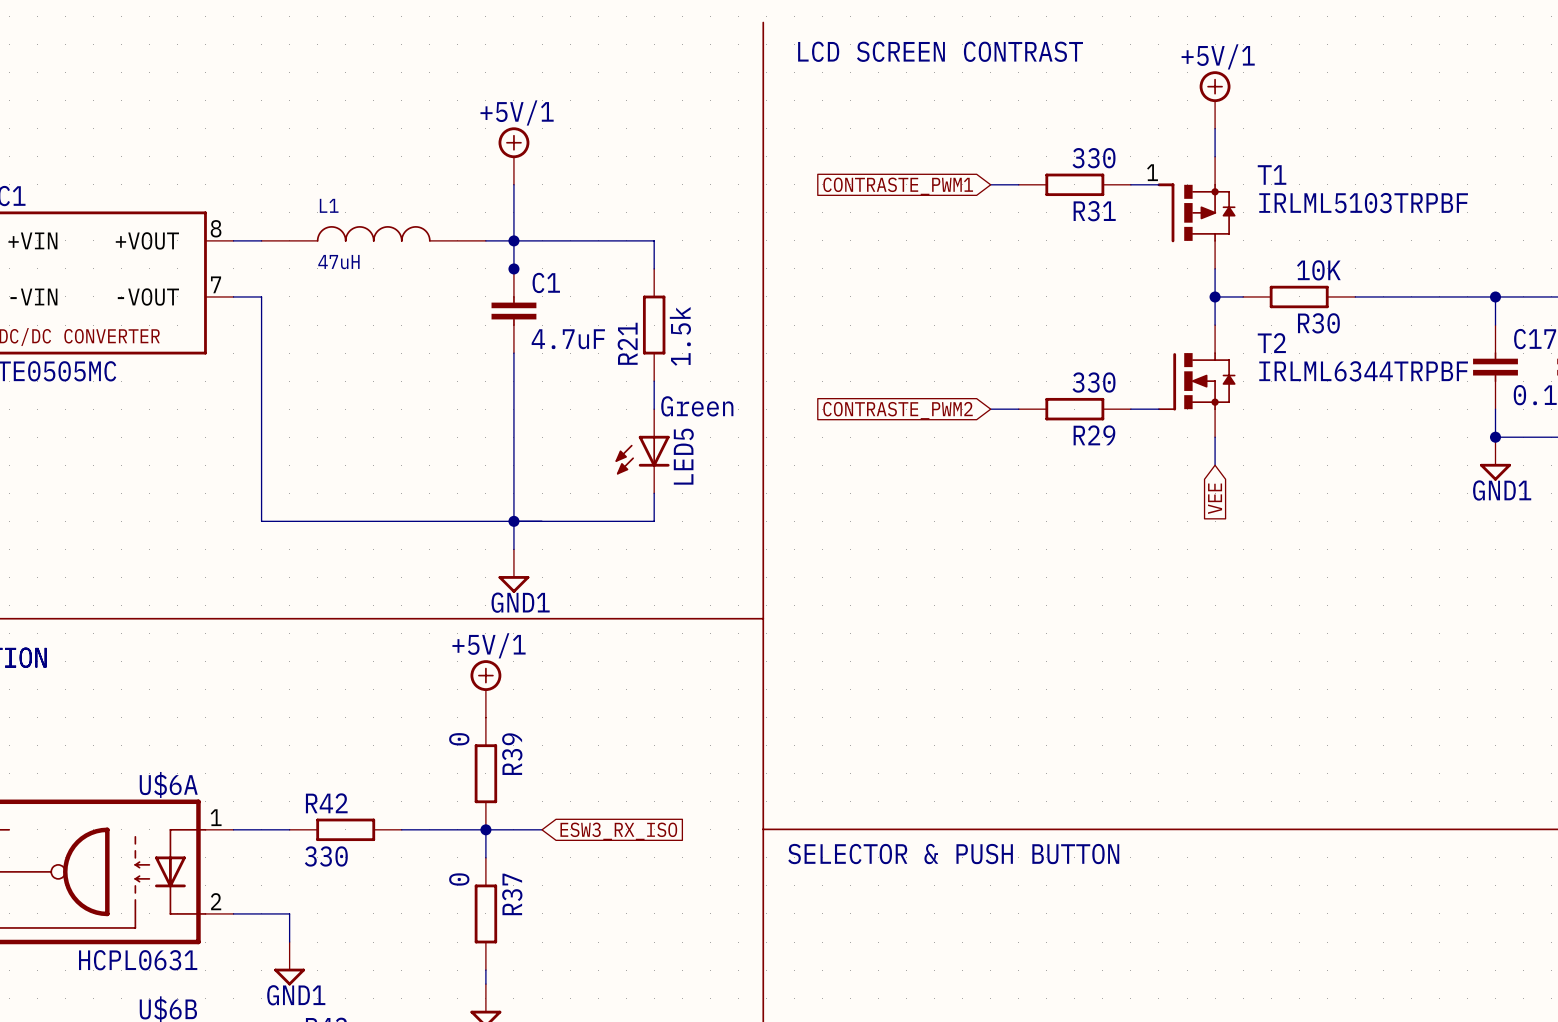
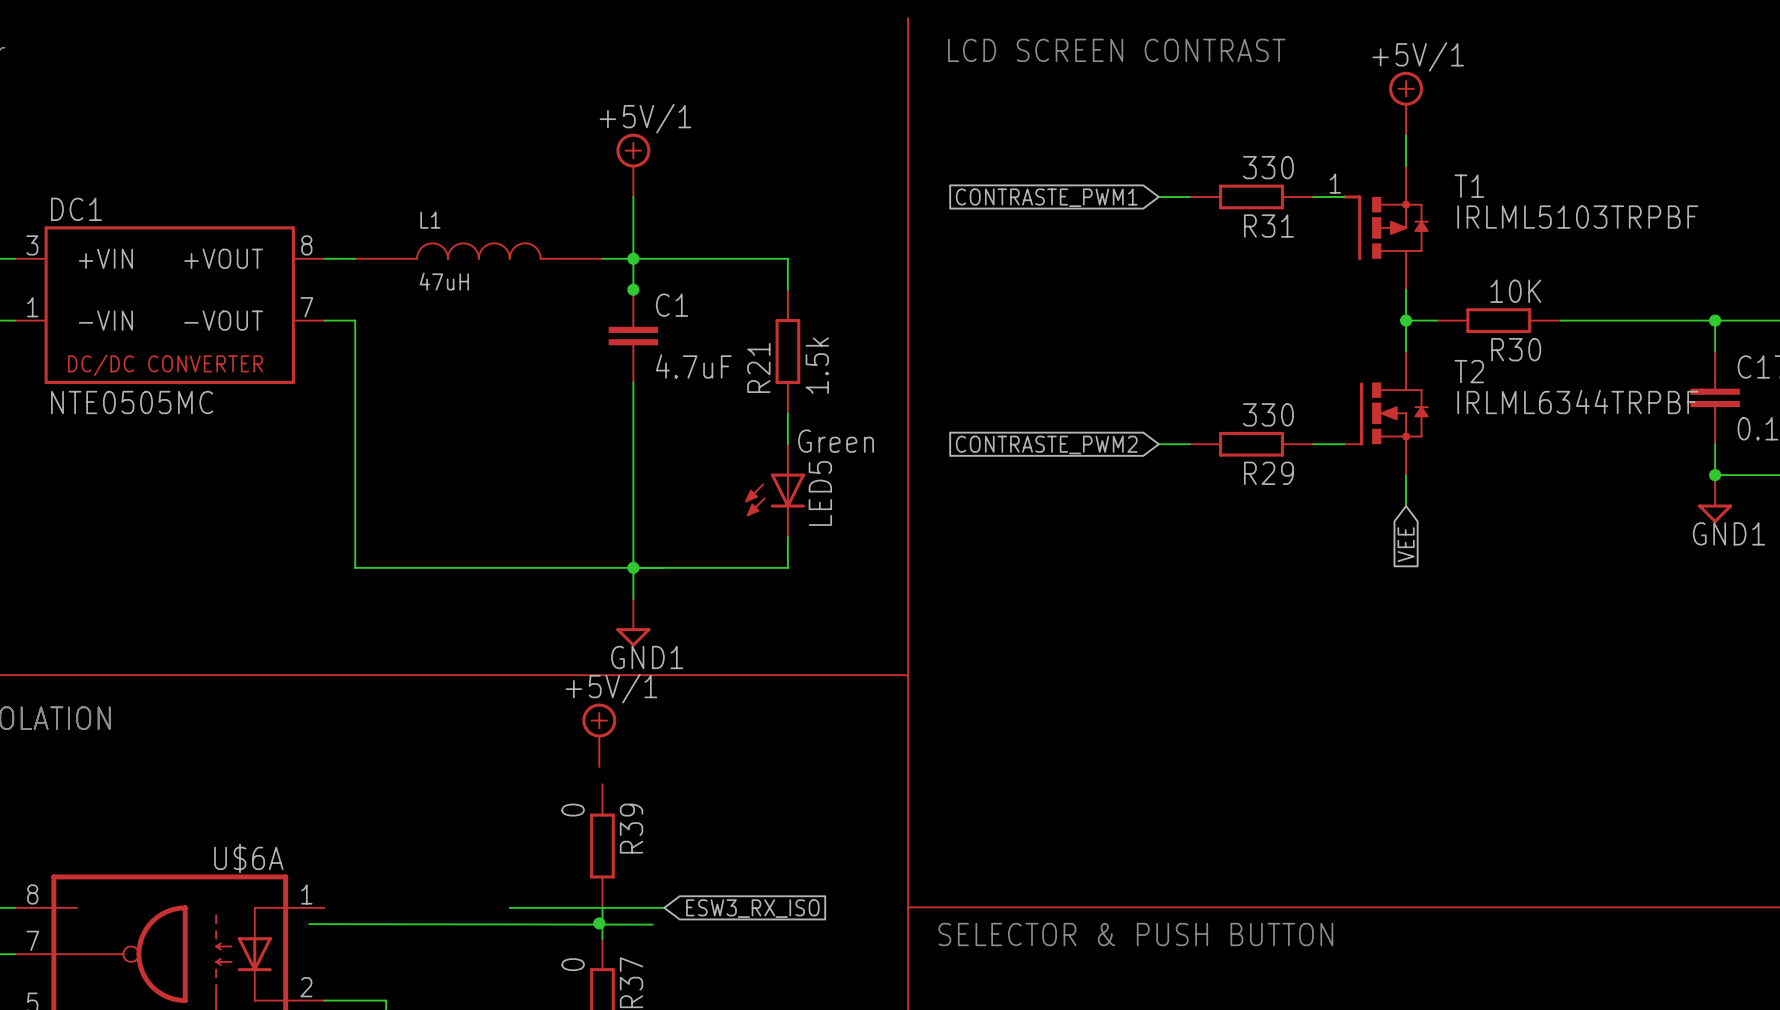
power symbol position: +5V/1 (485, 688) -> +5V/1 (599, 735)
wire: (233, 829) (289, 829) -> none
R42: 330 (345, 829) -> none
junction position: (485, 829) -> (599, 923)
wire: none -> (309, 924) (652, 924)

